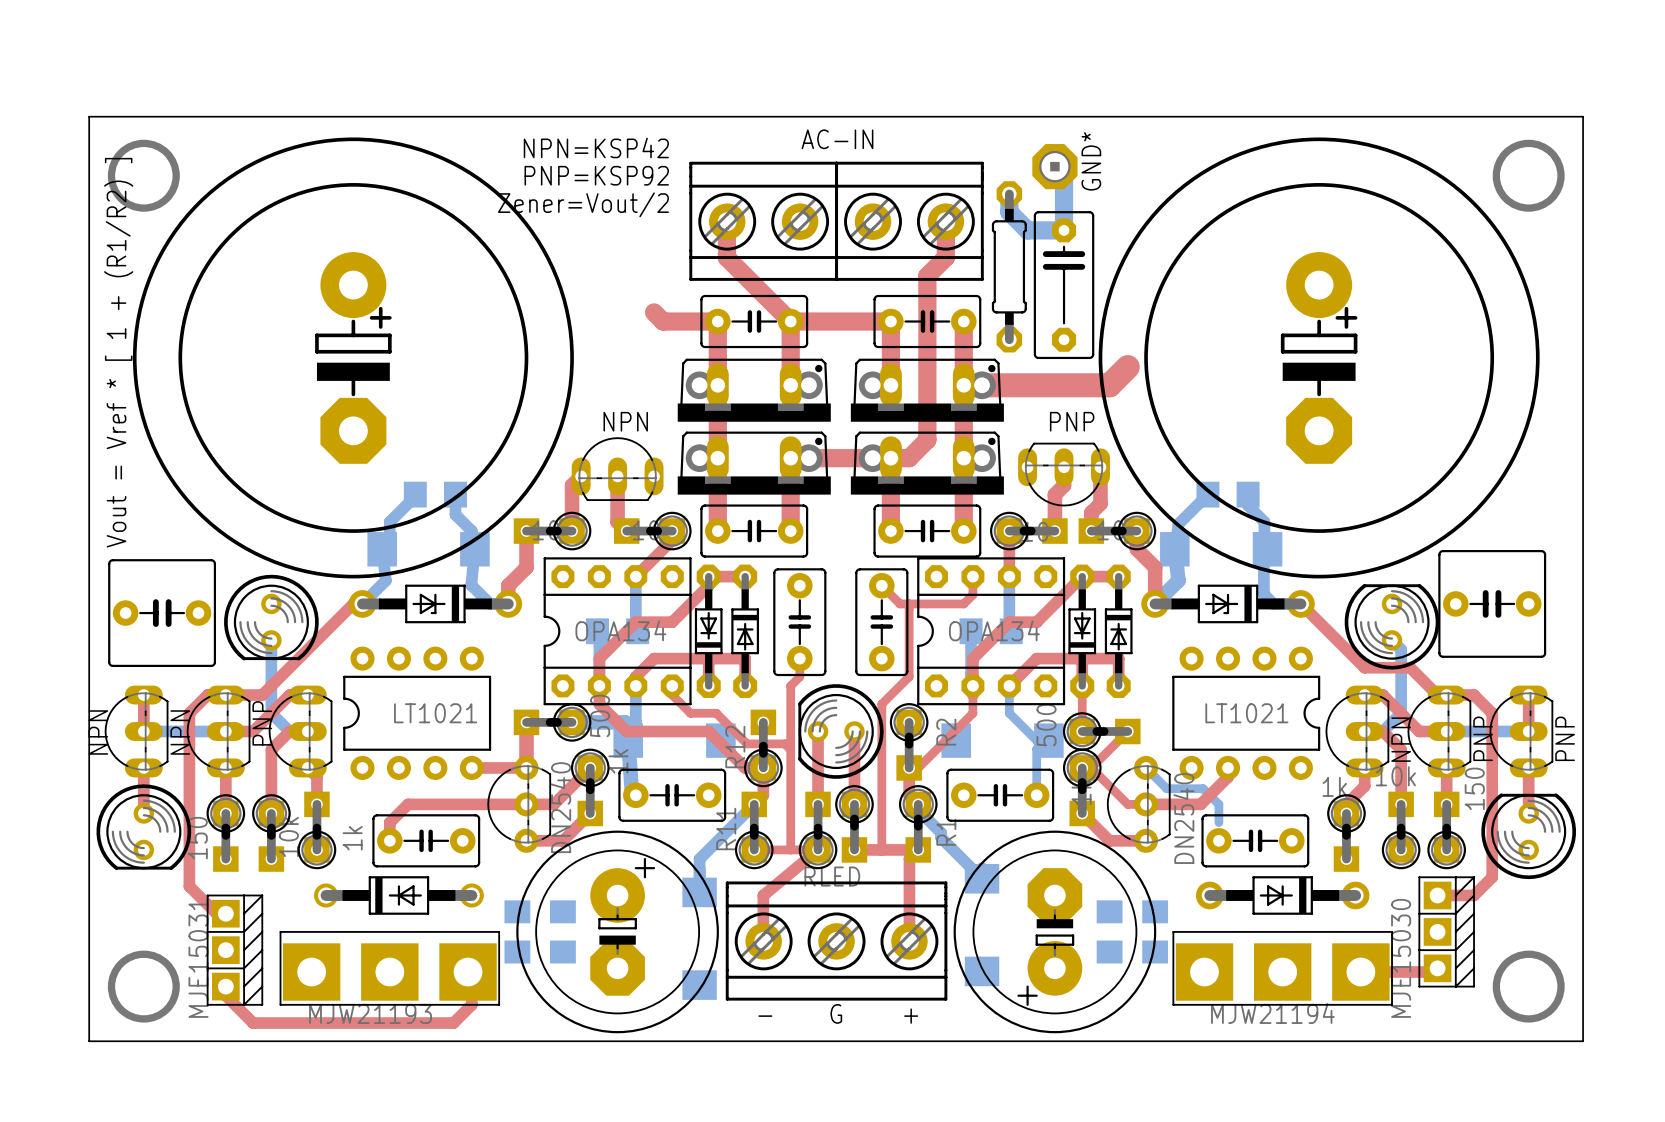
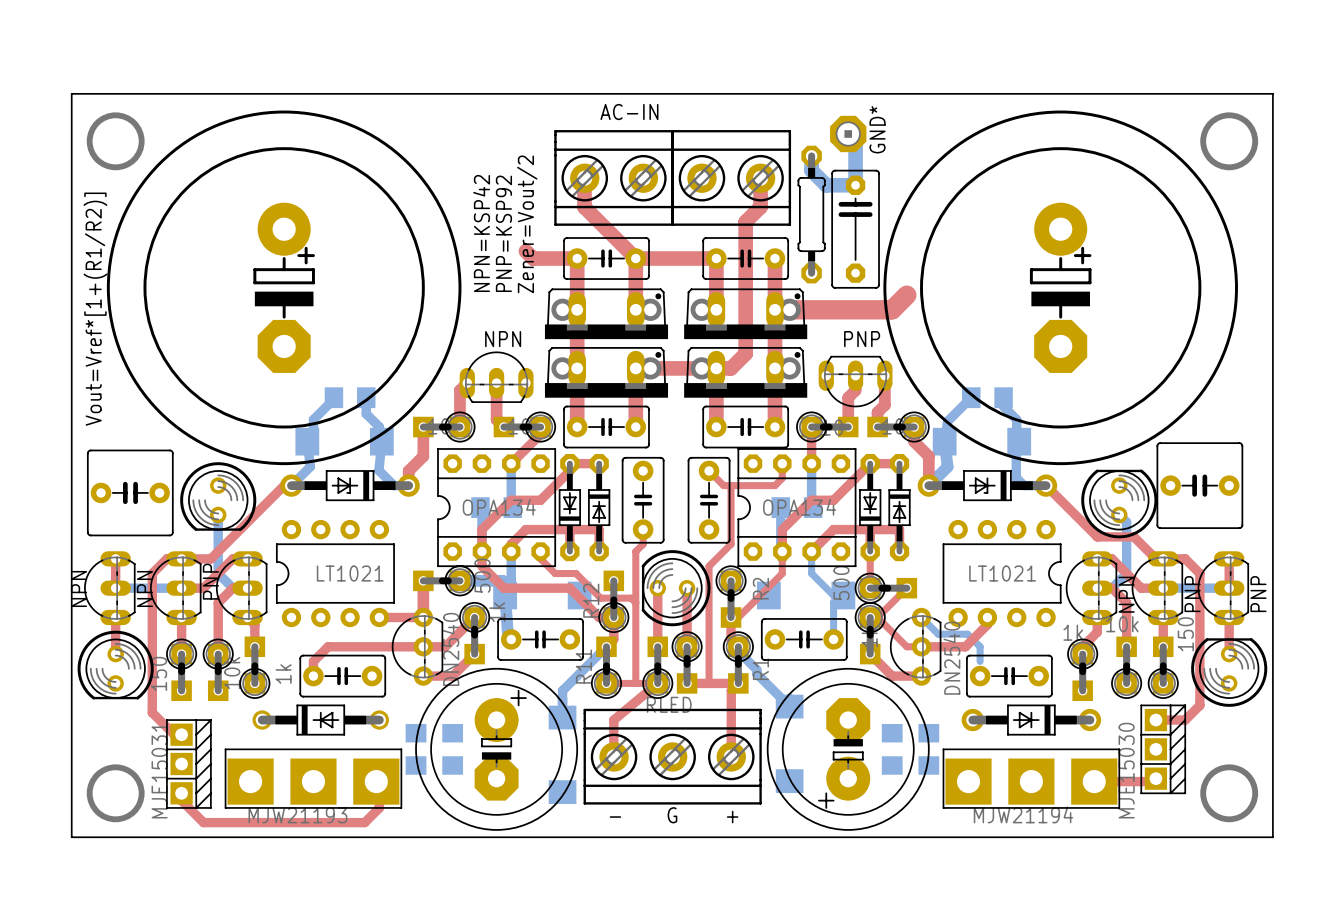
text position: AC-IN (837, 139) -> AC-IN (629, 112)
text rotation: 0° (596, 147) -> 90° counterclockwise (481, 233)
text rotation: 0° (596, 175) -> 90° counterclockwise (503, 233)
text rotation: 0° (583, 204) -> 90° counterclockwise (527, 224)
text: Vout = Vref * [ 1 + (R1/R2) ] (118, 352) -> Vout=Vref*[1+(R1/R2)] (95, 309)

